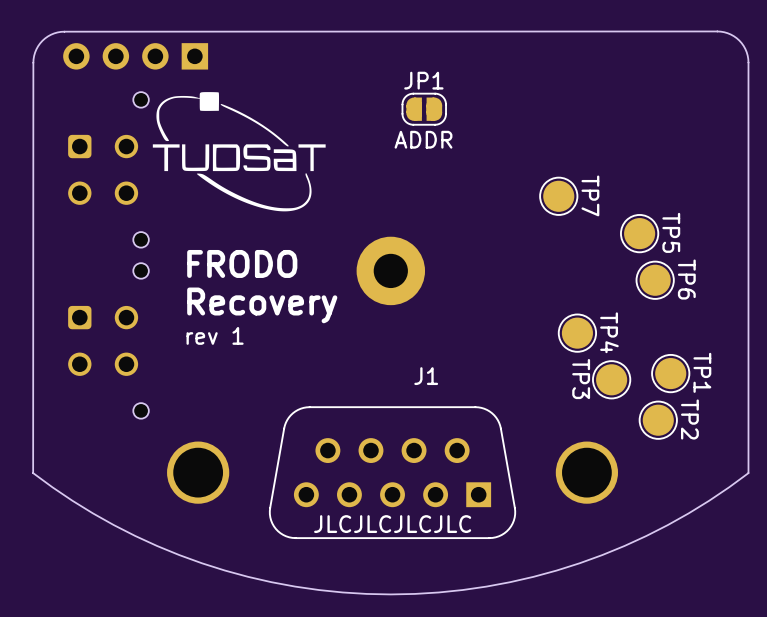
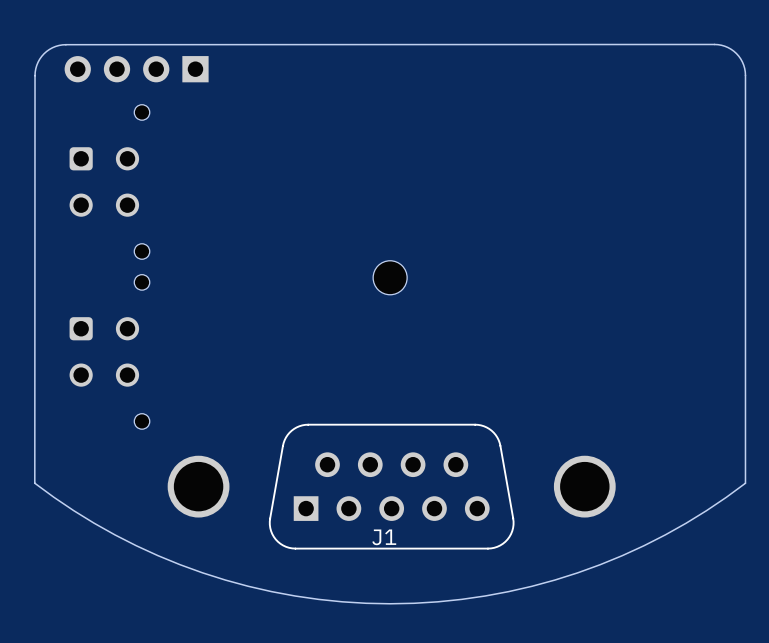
drawing: [152, 92, 326, 212] -> none
JP1: (424, 109) -> none
TP7: (558, 196) -> none
TP5: (639, 233) -> none
part footprint: [356, 236, 426, 306] -> [373, 260, 408, 295]
text: FRODO (242, 263) -> none
TP6: (655, 280) -> none
text: Recovery (262, 305) -> none
TP4: (577, 333) -> none
text: rev 1 (215, 335) -> none
TP1: (670, 373) -> none
J1 name position: J1 (426, 376) -> J1 (384, 537)
TP3: (611, 379) -> none
J1 footprint: [167, 406, 619, 540] -> [167, 423, 616, 550]
TP2: (658, 420) -> none
text: JLCJLCJLCJLC (392, 524) -> none

